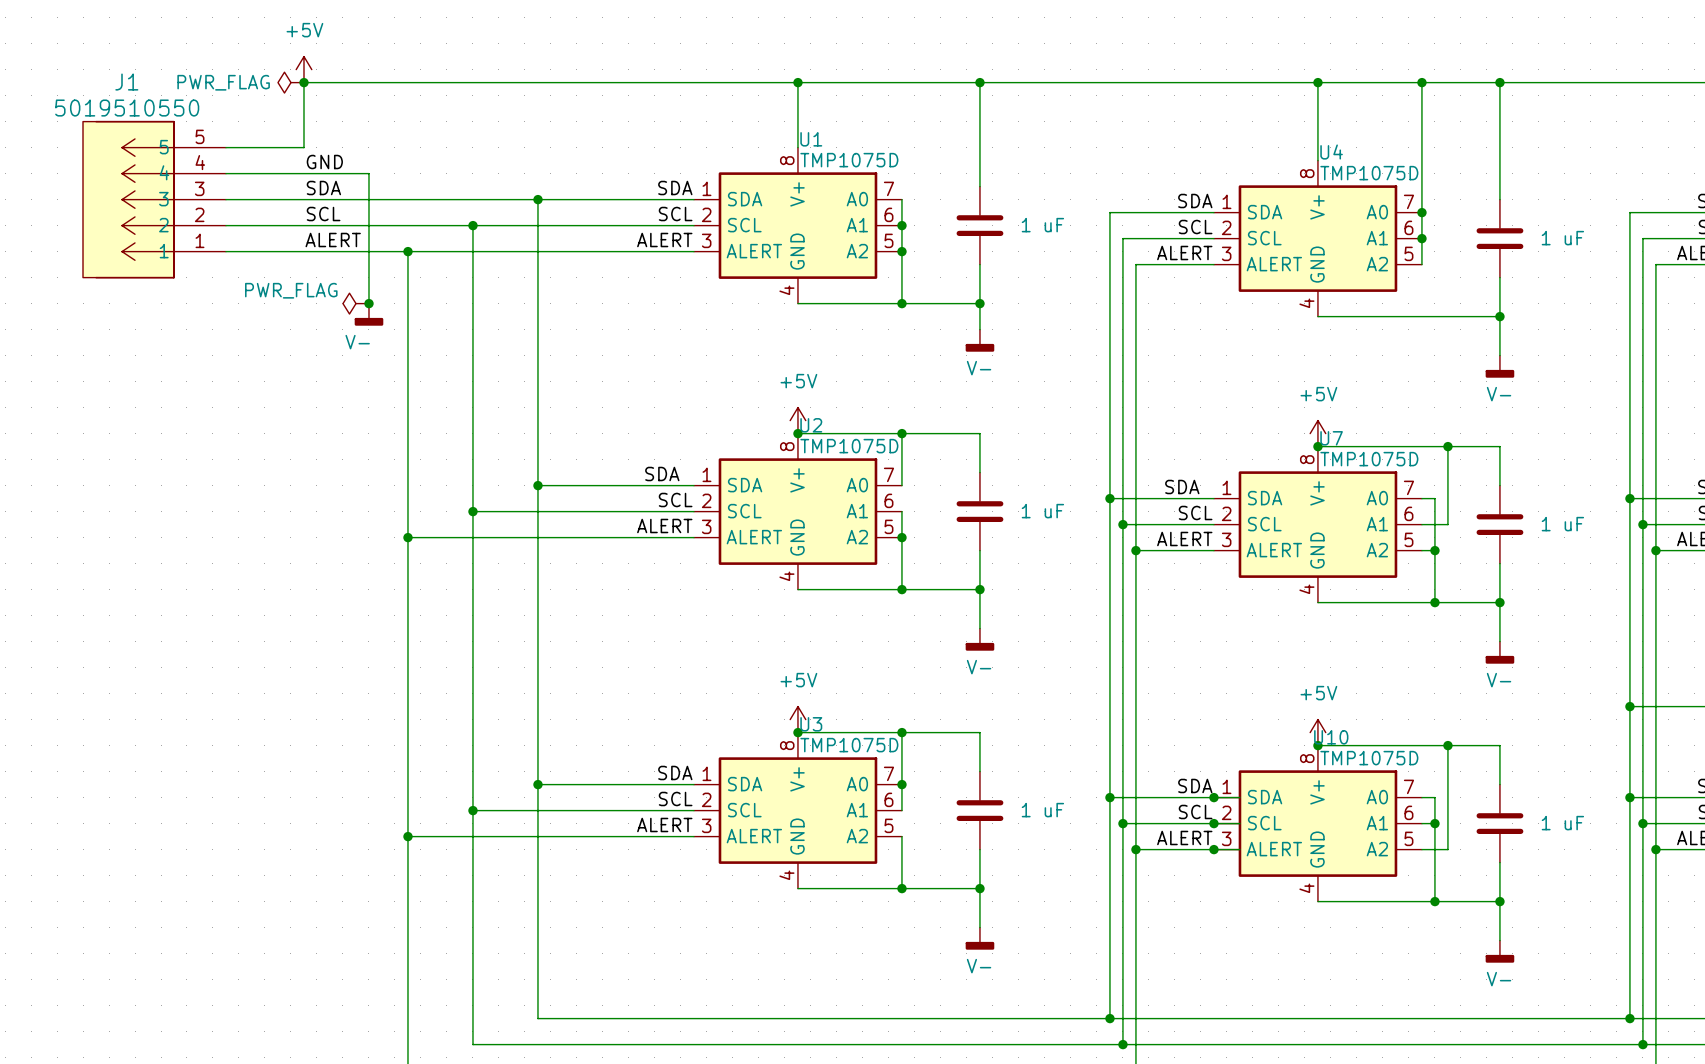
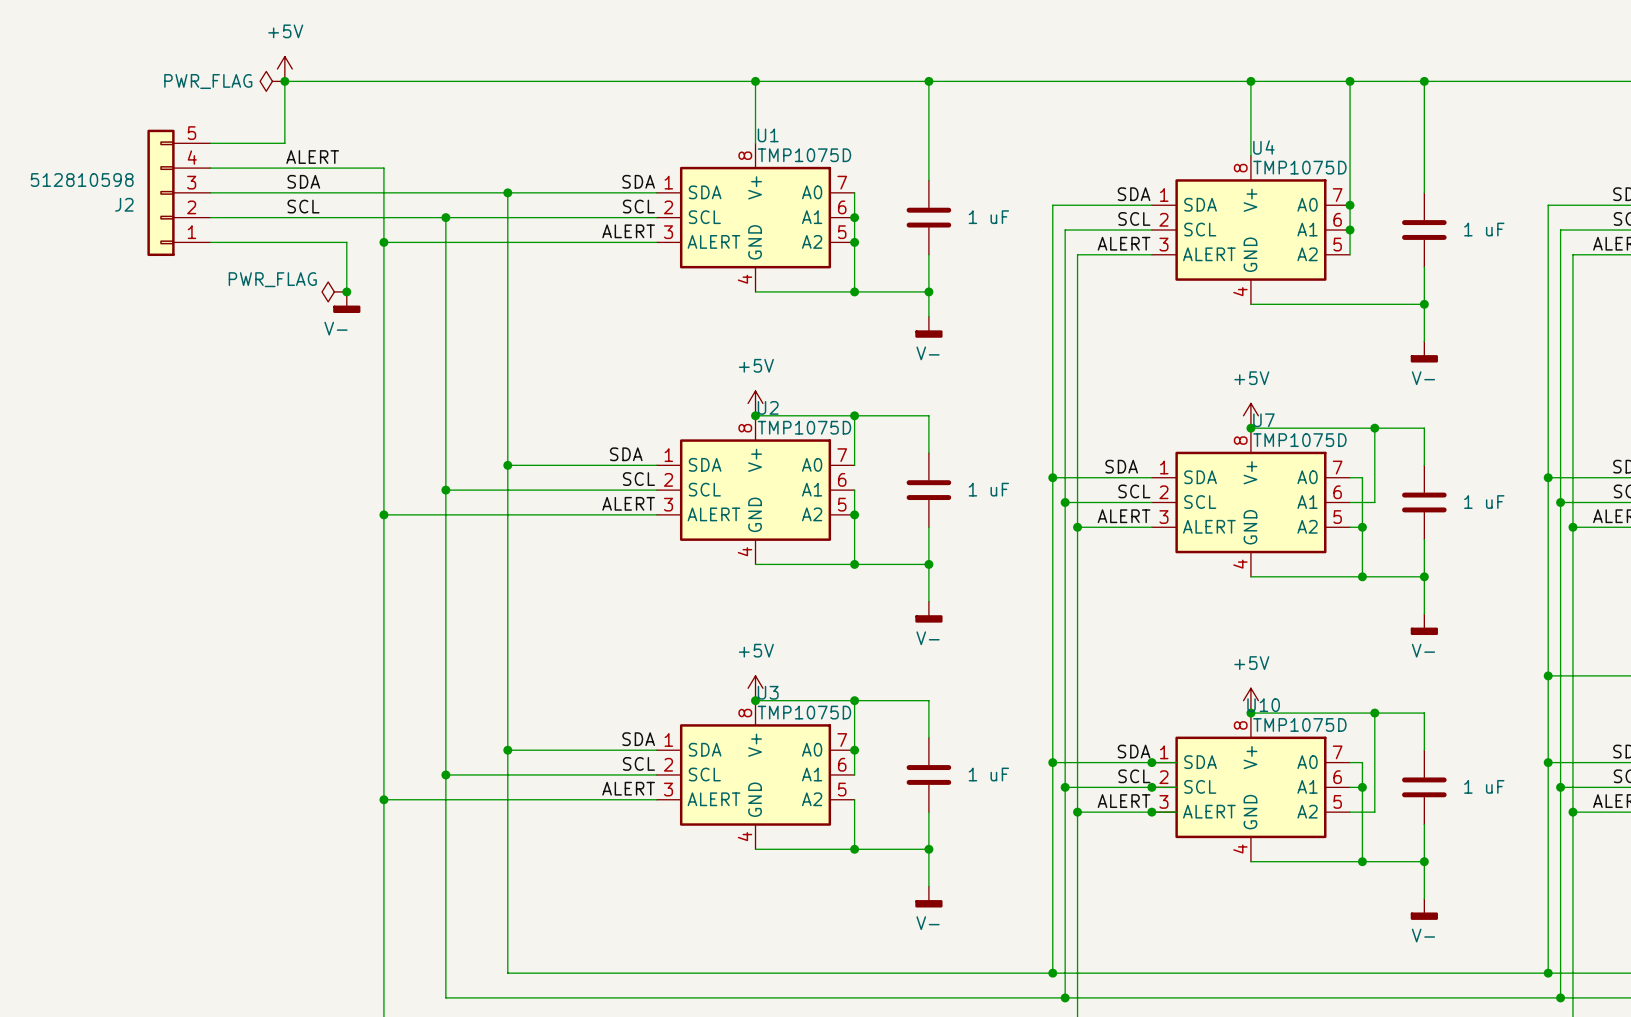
label: GND (324, 162) -> ALERT (312, 157)
wire: (368, 173) (368, 251) (407, 251) -> (346, 168) (383, 168) (383, 242)
J1: 5019510550 (154, 199) -> none
J2: none -> 512810598 (178, 192)
label: ALERT (333, 240) -> none

